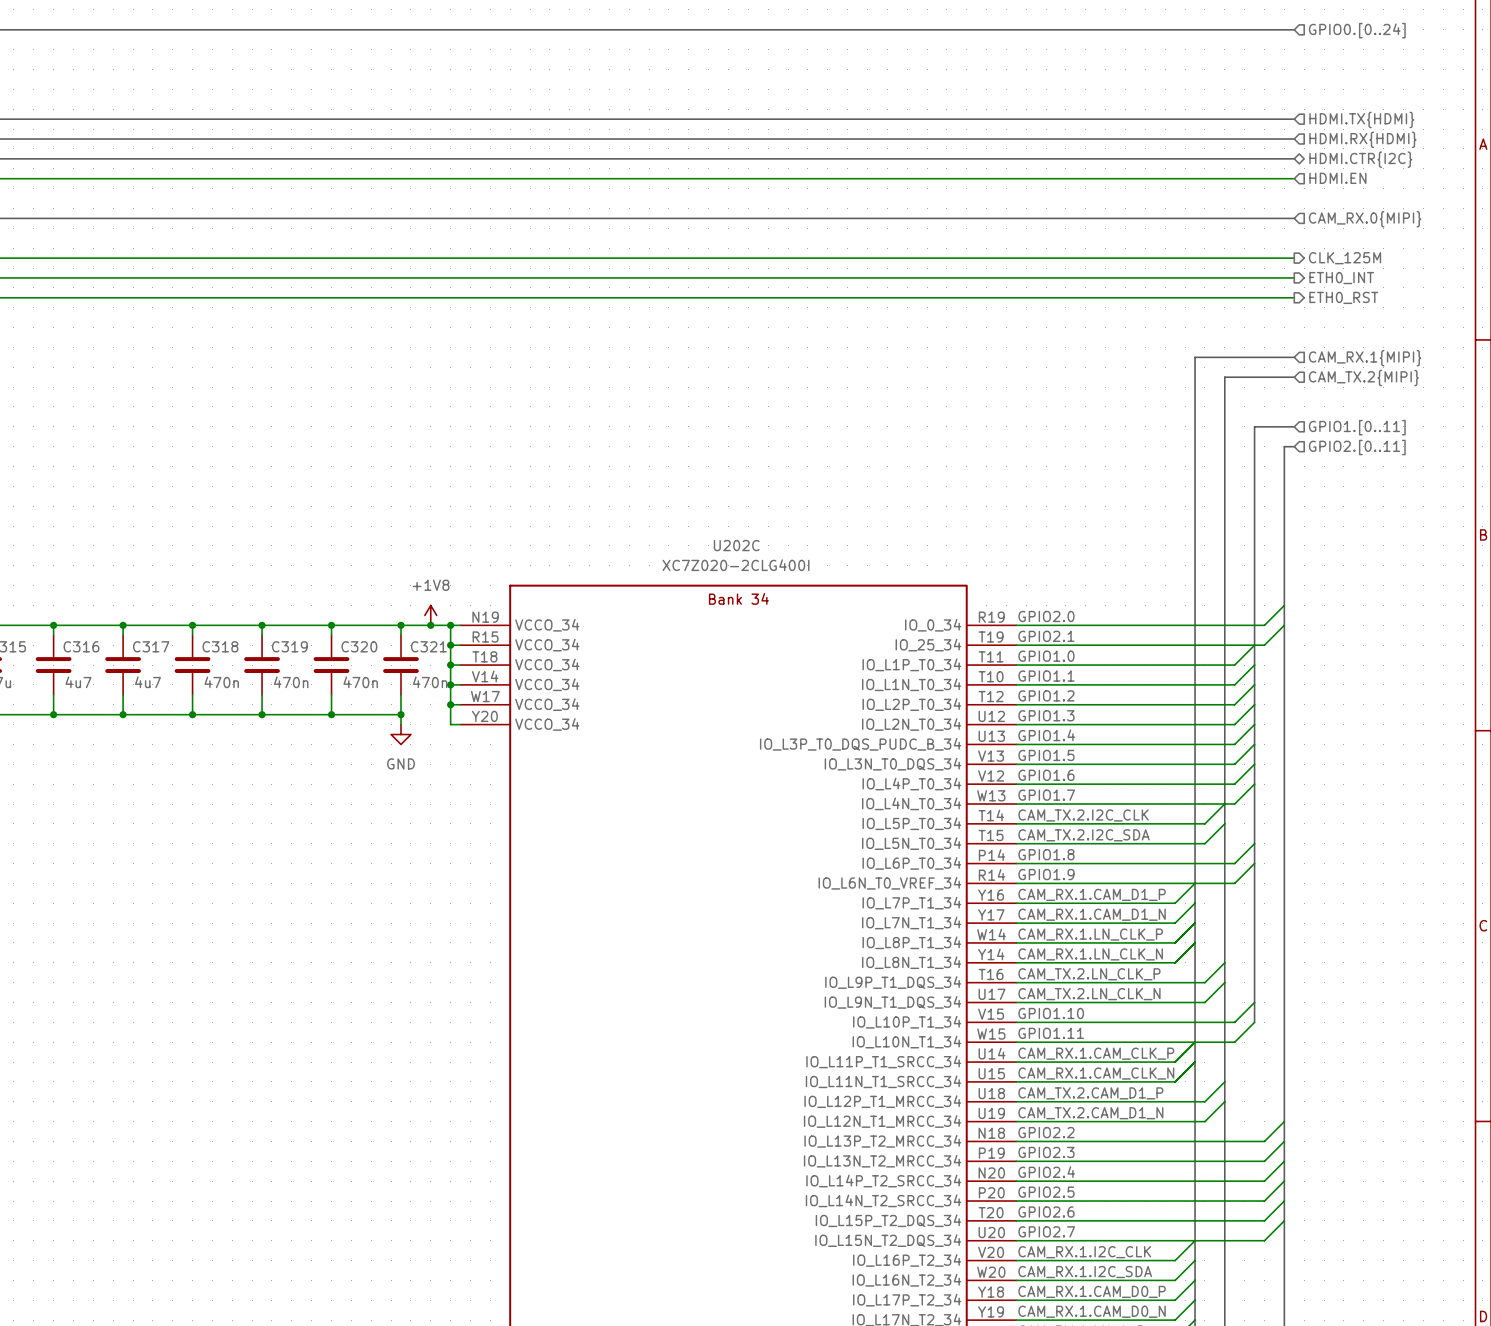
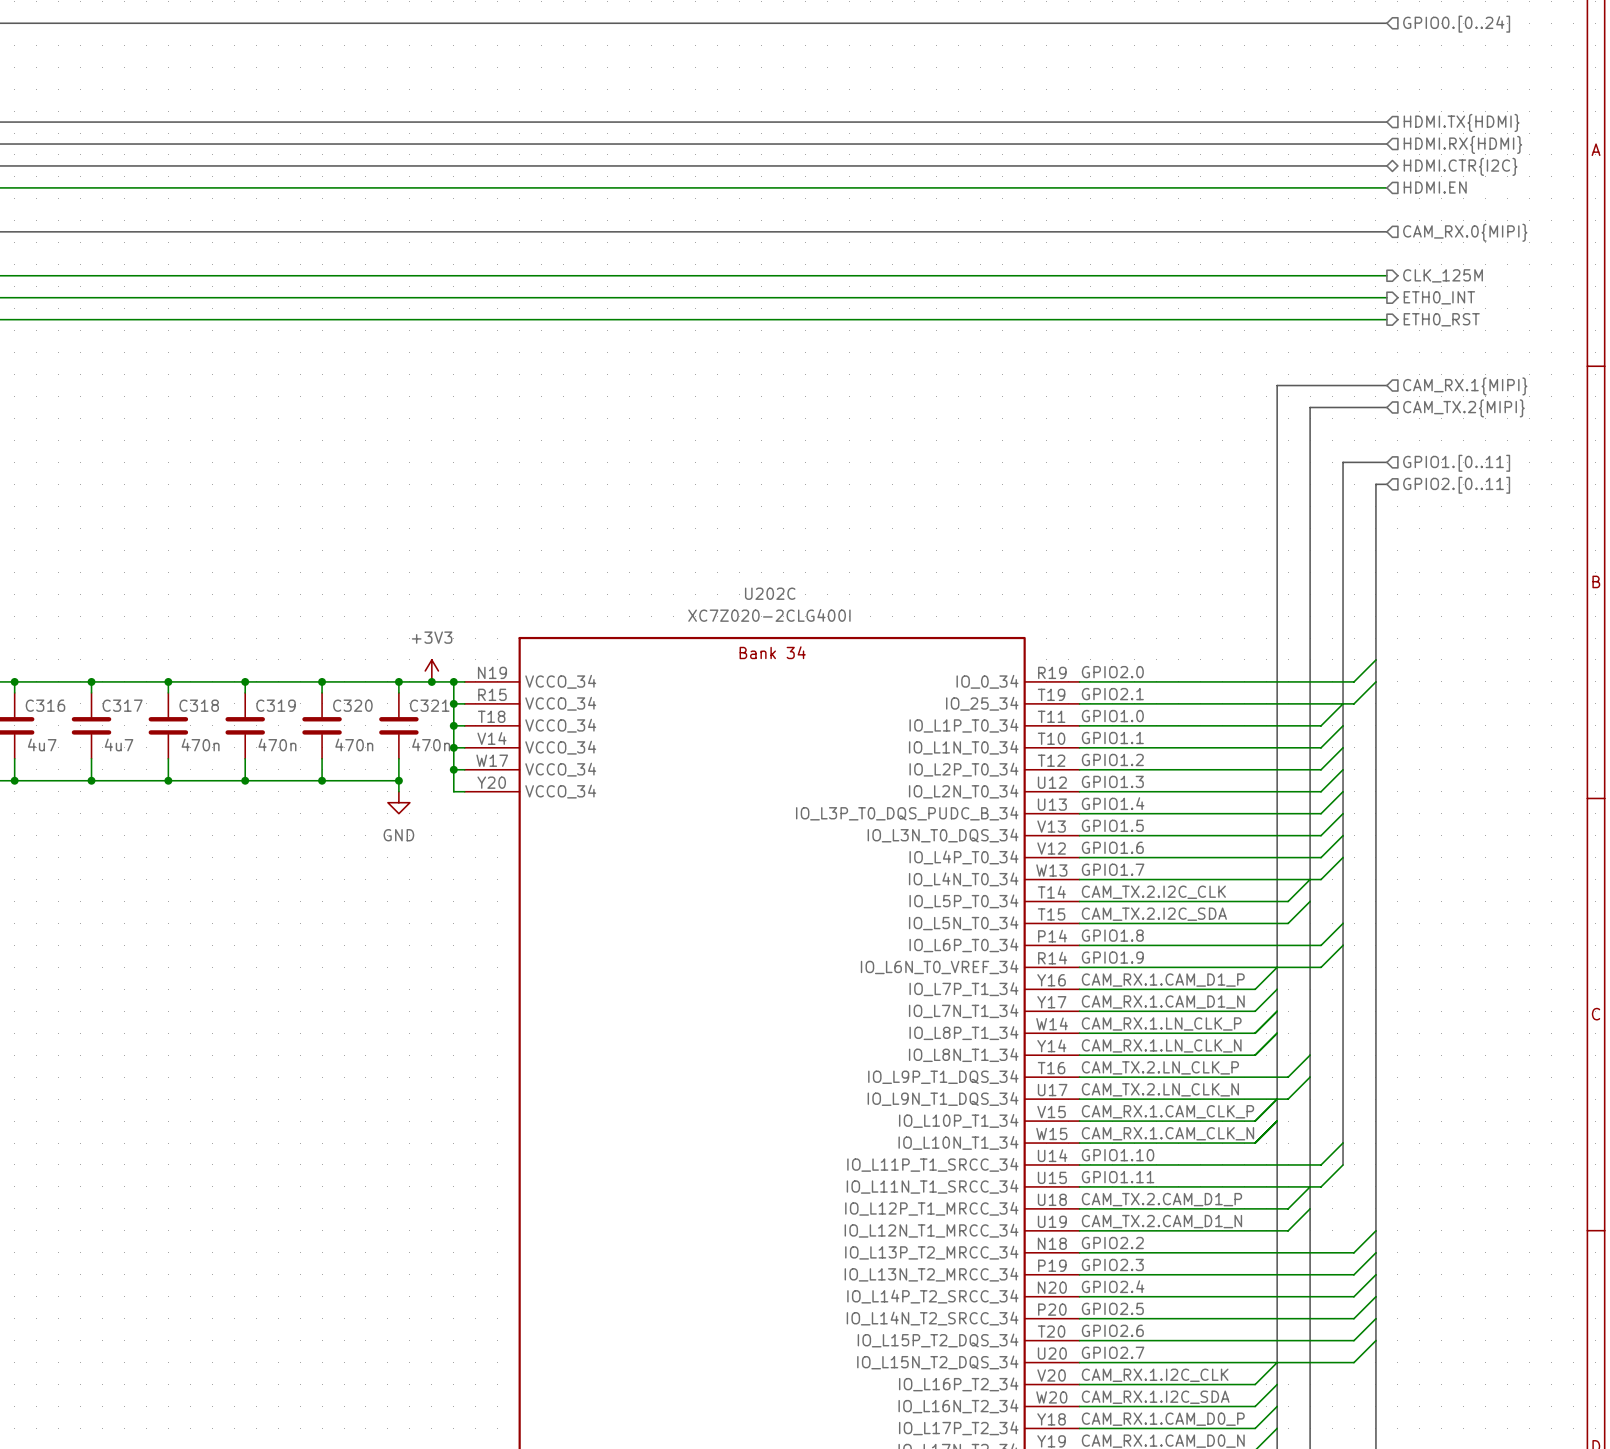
power symbol: +1V8 (430, 615) -> +3V3 (431, 670)
wire: (1254, 1002) (1234, 1022) (1175, 1022) -> (1277, 1099) (1255, 1121)
label: GPIO1.10 (1051, 1013) -> CAM_RX.1.CAM_CLK_P (1167, 1111)
wire: (1254, 1022) (1234, 1042) (1175, 1042) -> (1277, 1121) (1255, 1143)
bus: none -> (1343, 1121) (1343, 1164)
label: GPIO1.11 (1051, 1033) -> CAM_RX.1.CAM_CLK_N (1167, 1133)
wire: (1195, 1042) (1175, 1062) -> (1343, 1143) (1321, 1164) (1255, 1164)
label: CAM_RX.1.CAM_CLK_P (1096, 1053) -> GPIO1.10 (1118, 1155)
wire: (1195, 1062) (1175, 1081) -> (1343, 1164) (1321, 1186) (1255, 1186)
label: CAM_RX.1.CAM_CLK_N (1096, 1073) -> GPIO1.11 (1118, 1177)

